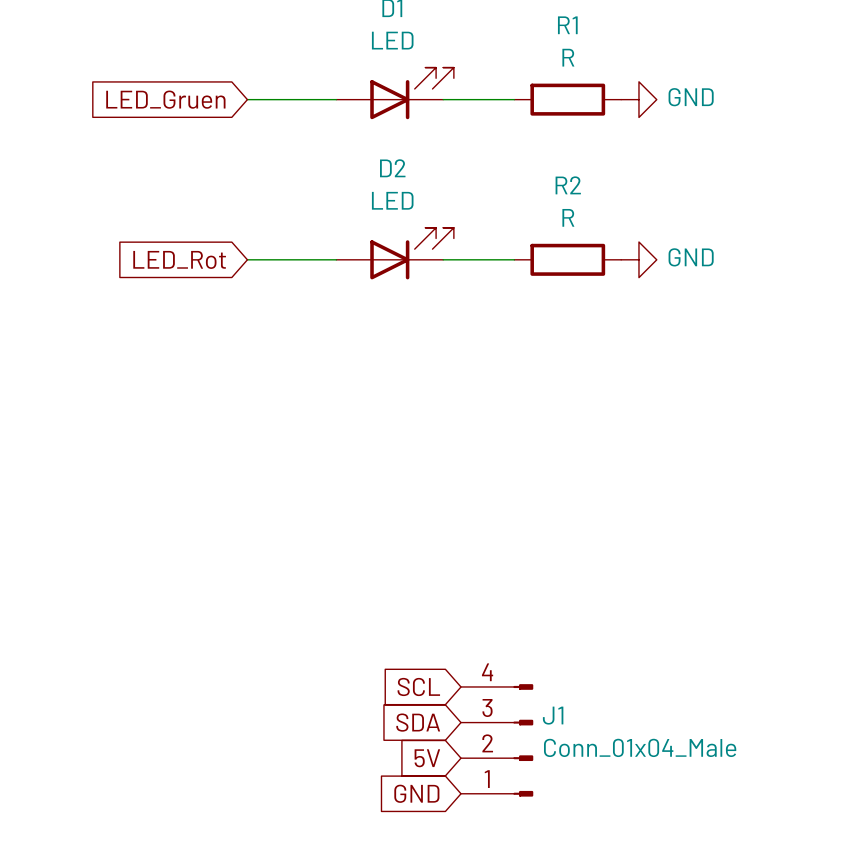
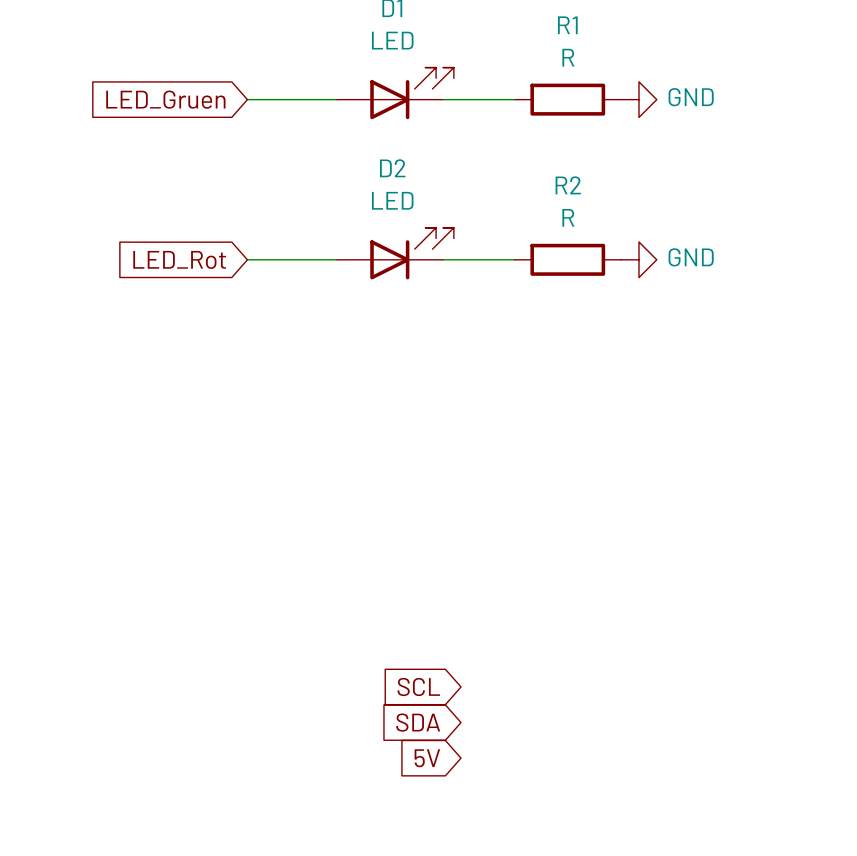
J1: Conn_01x04_Male (497, 740) -> none
global label: GND (416, 793) -> none

